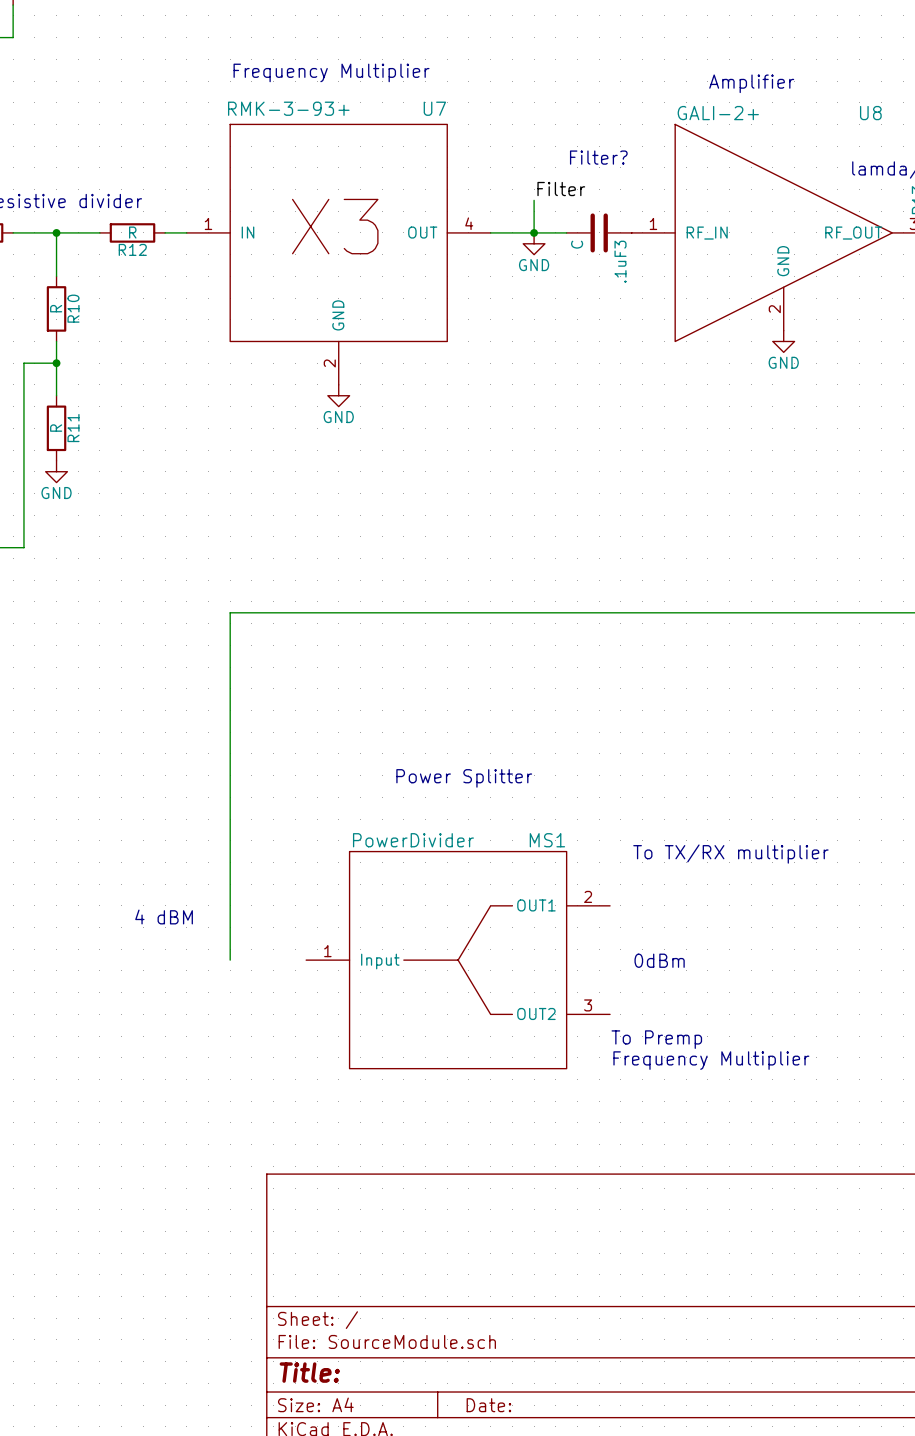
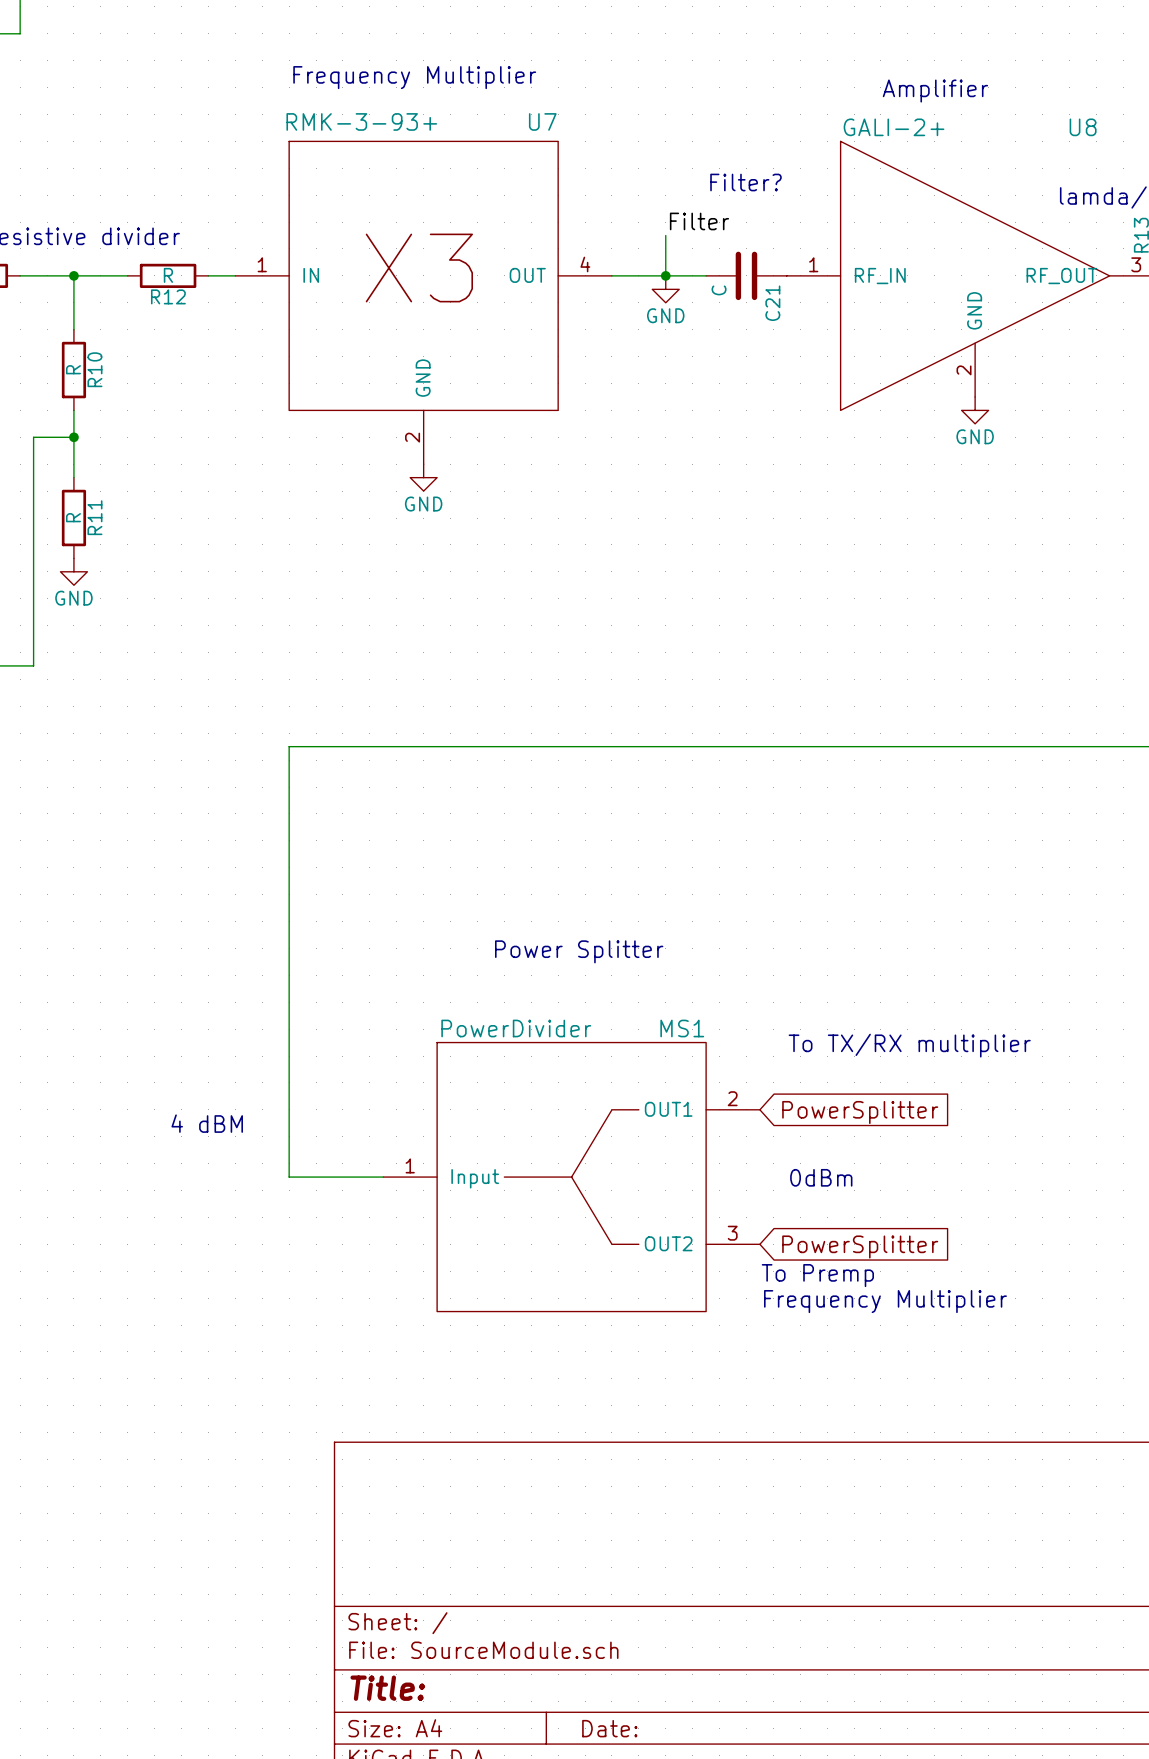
.1uF3 name: .1uF3 (620, 261) -> C21 (772, 303)
global label: none -> PowerSplitter (860, 1112)
wire: none -> (289, 1177) (383, 1177)
global label: none -> PowerSplitter (860, 1247)

